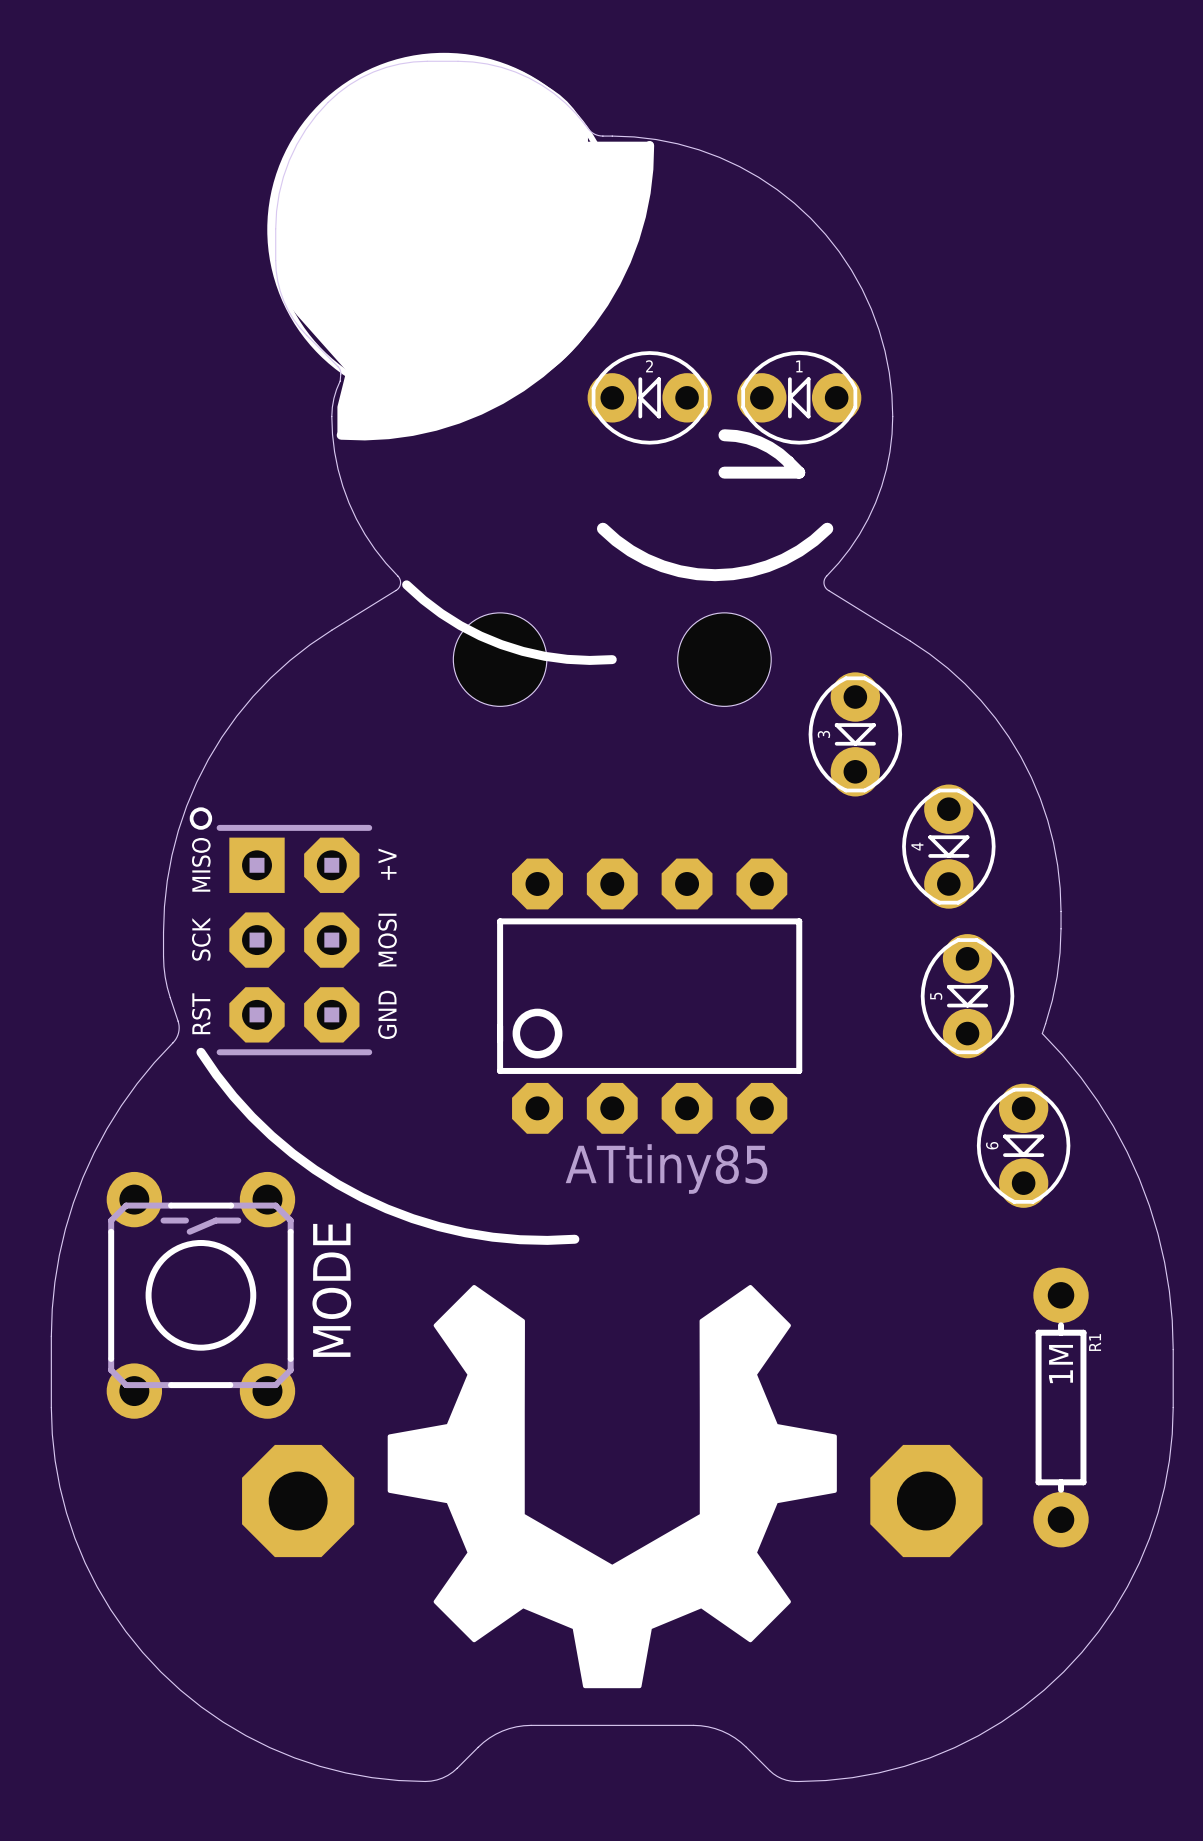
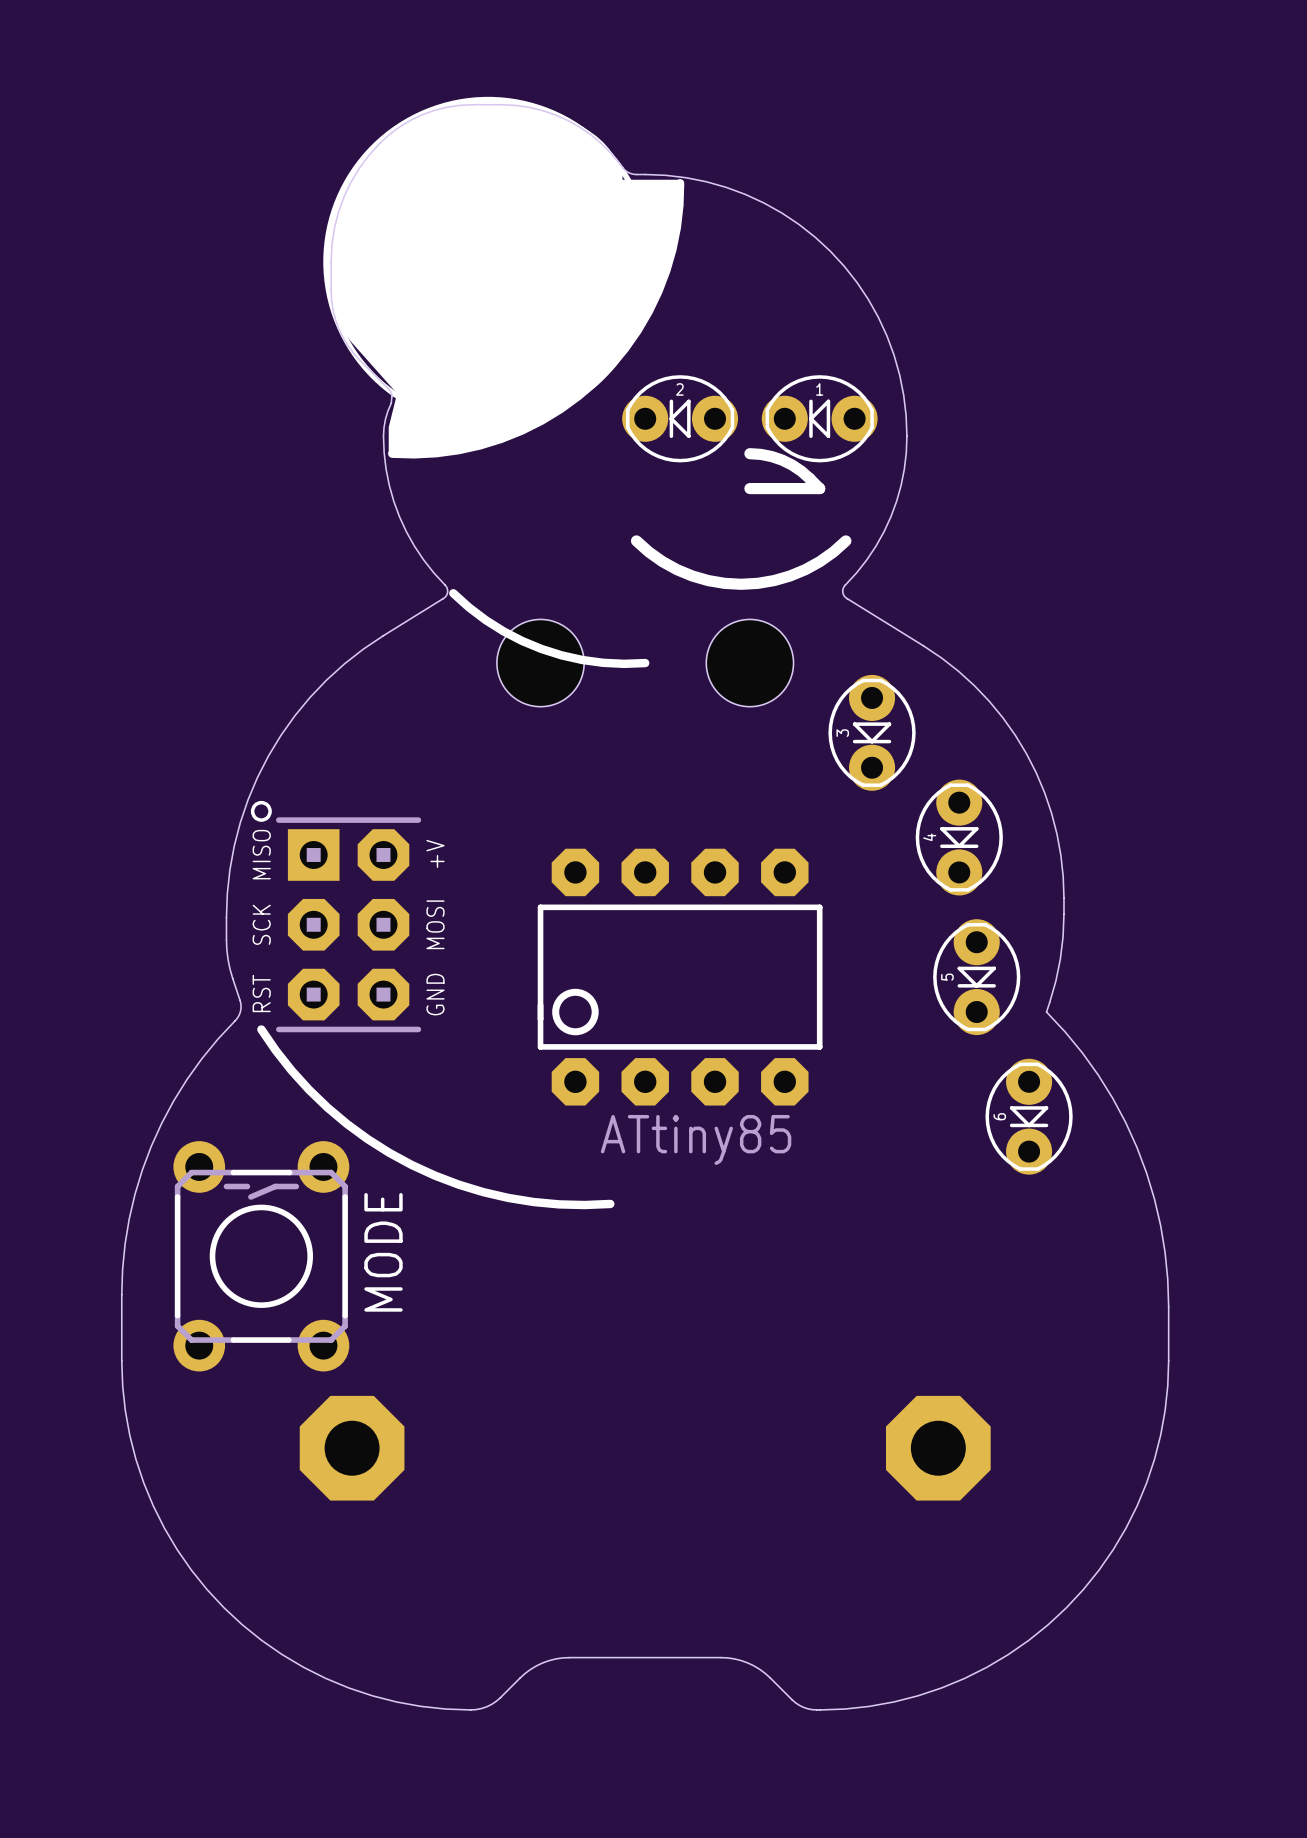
drawing: [387, 1284, 837, 1689] -> none
R1: 1M (1061, 1407) -> none

